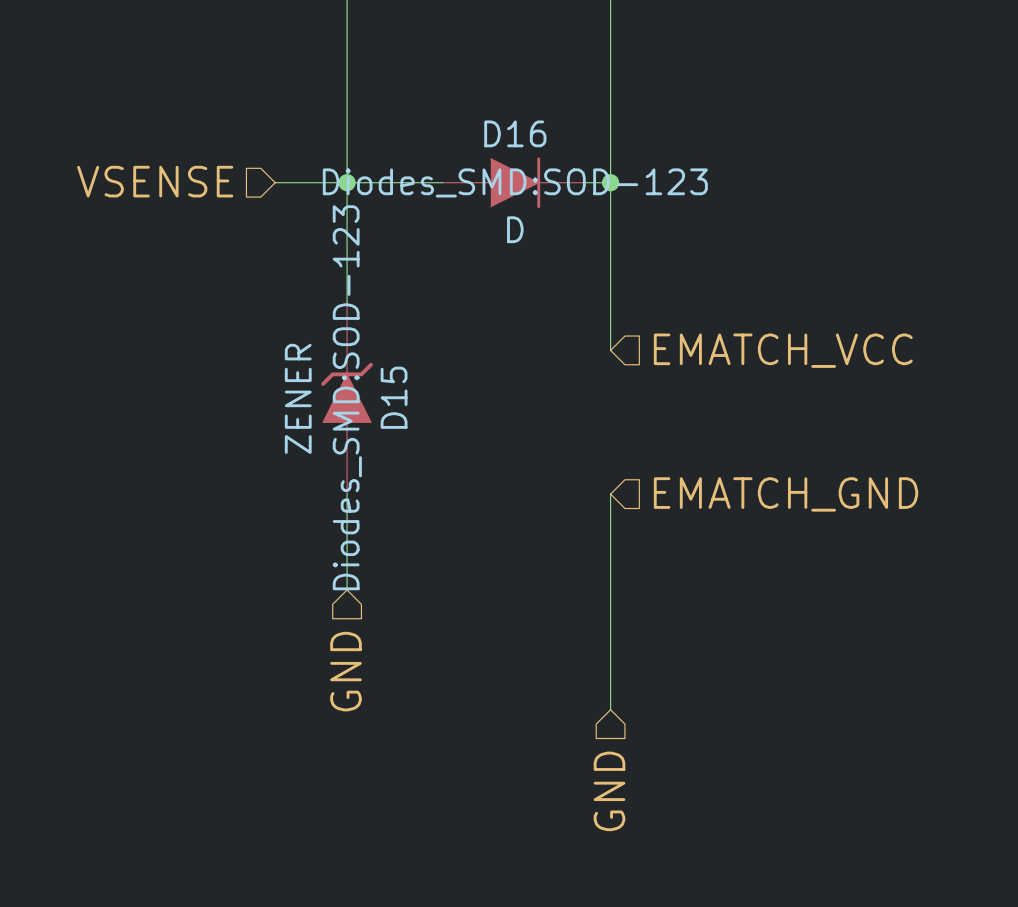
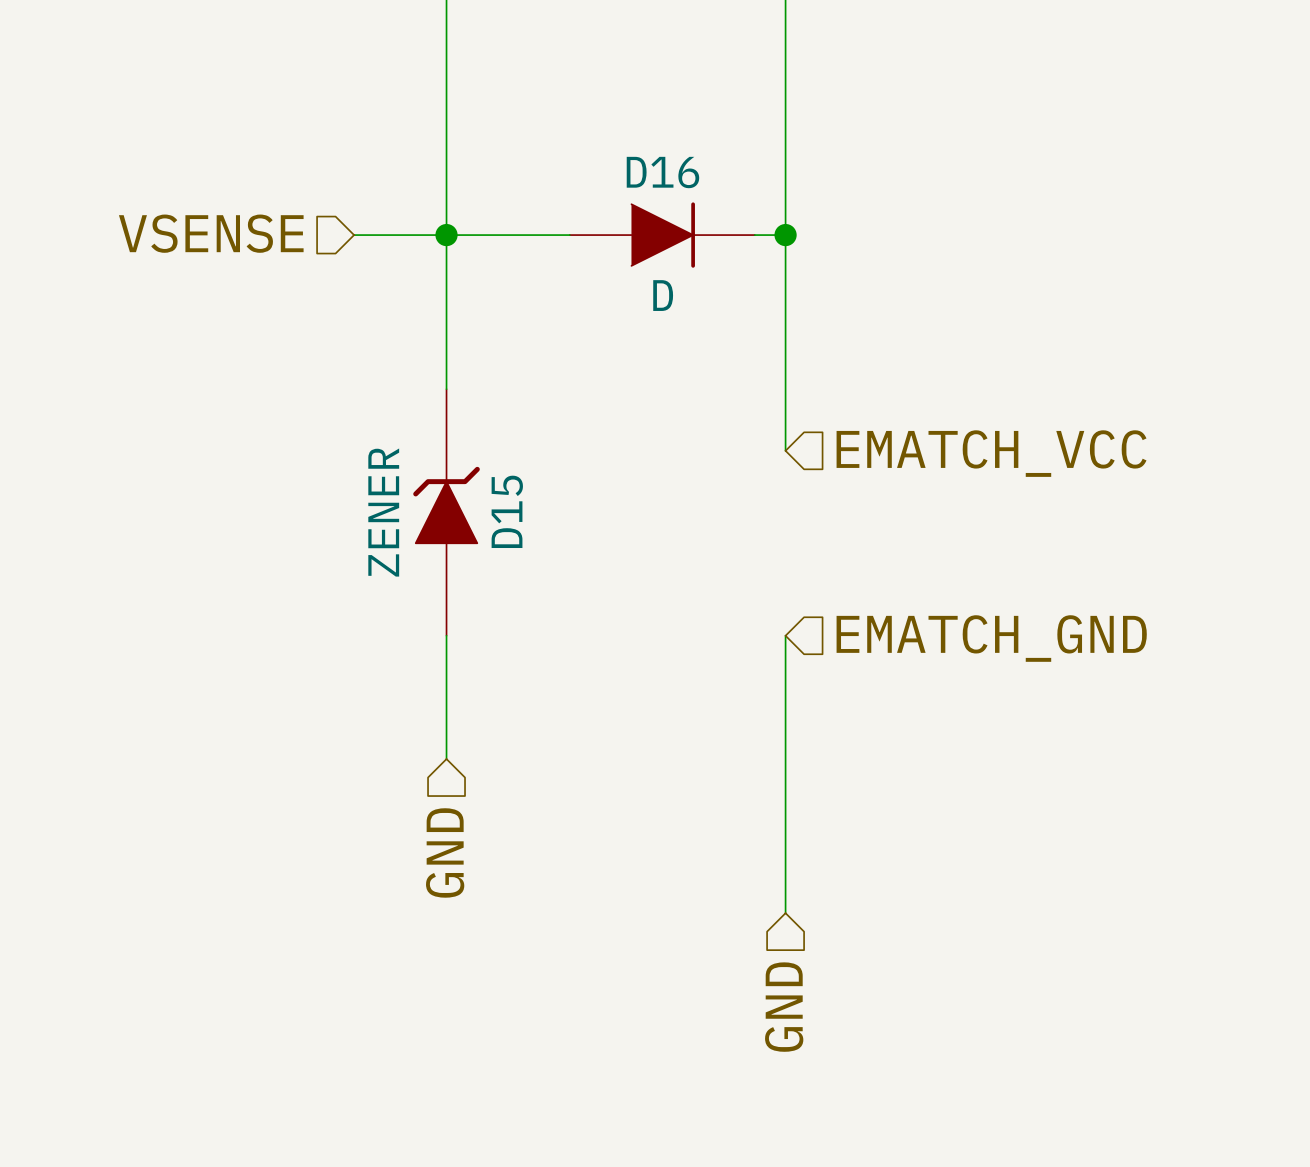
D16 text: Diodes_SMD:SOD-123 (515, 182) -> none
D15 text: Diodes_SMD:SOD-123 (347, 397) -> none

